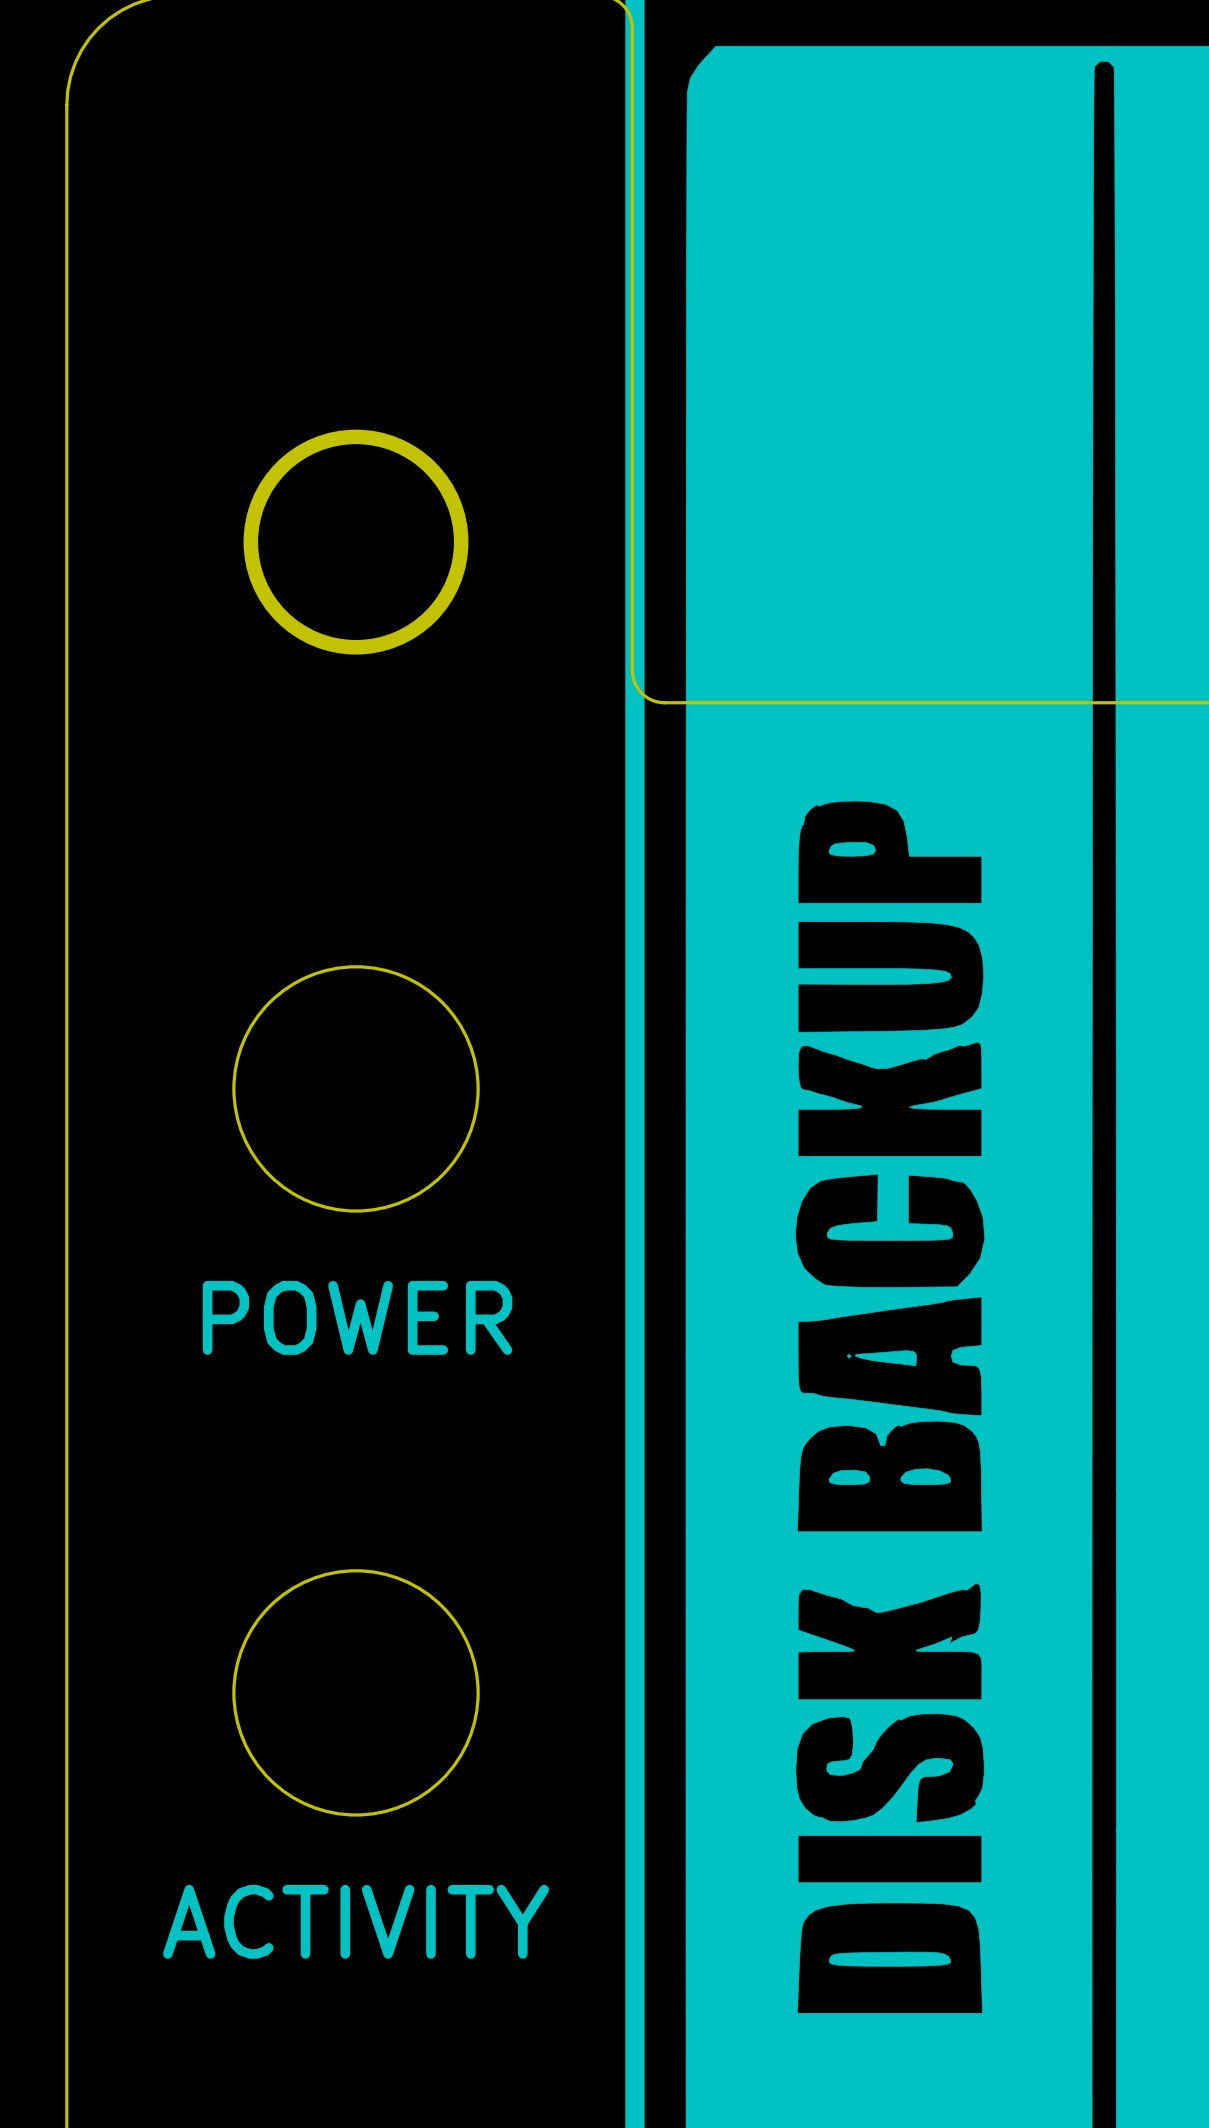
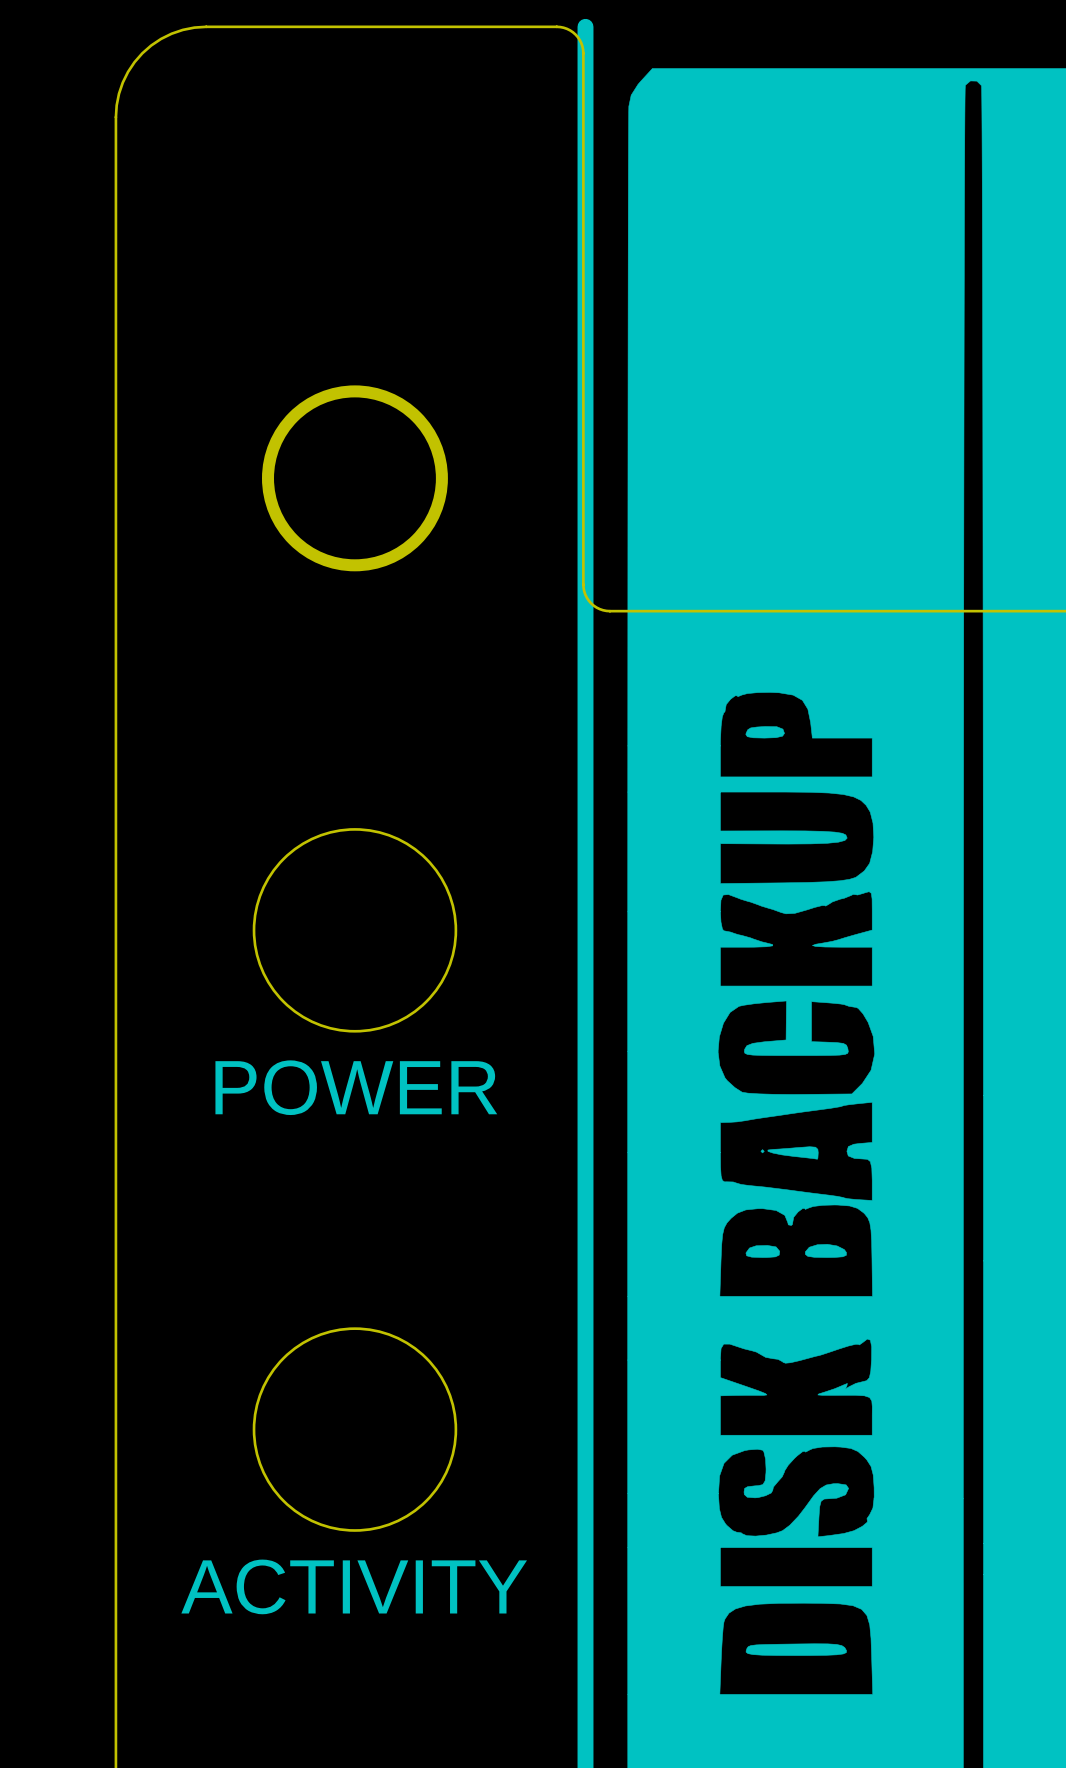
text position: POWER (357, 1317) -> POWER (356, 1087)
text position: ACTIVITY (356, 1921) -> ACTIVITY (354, 1586)

